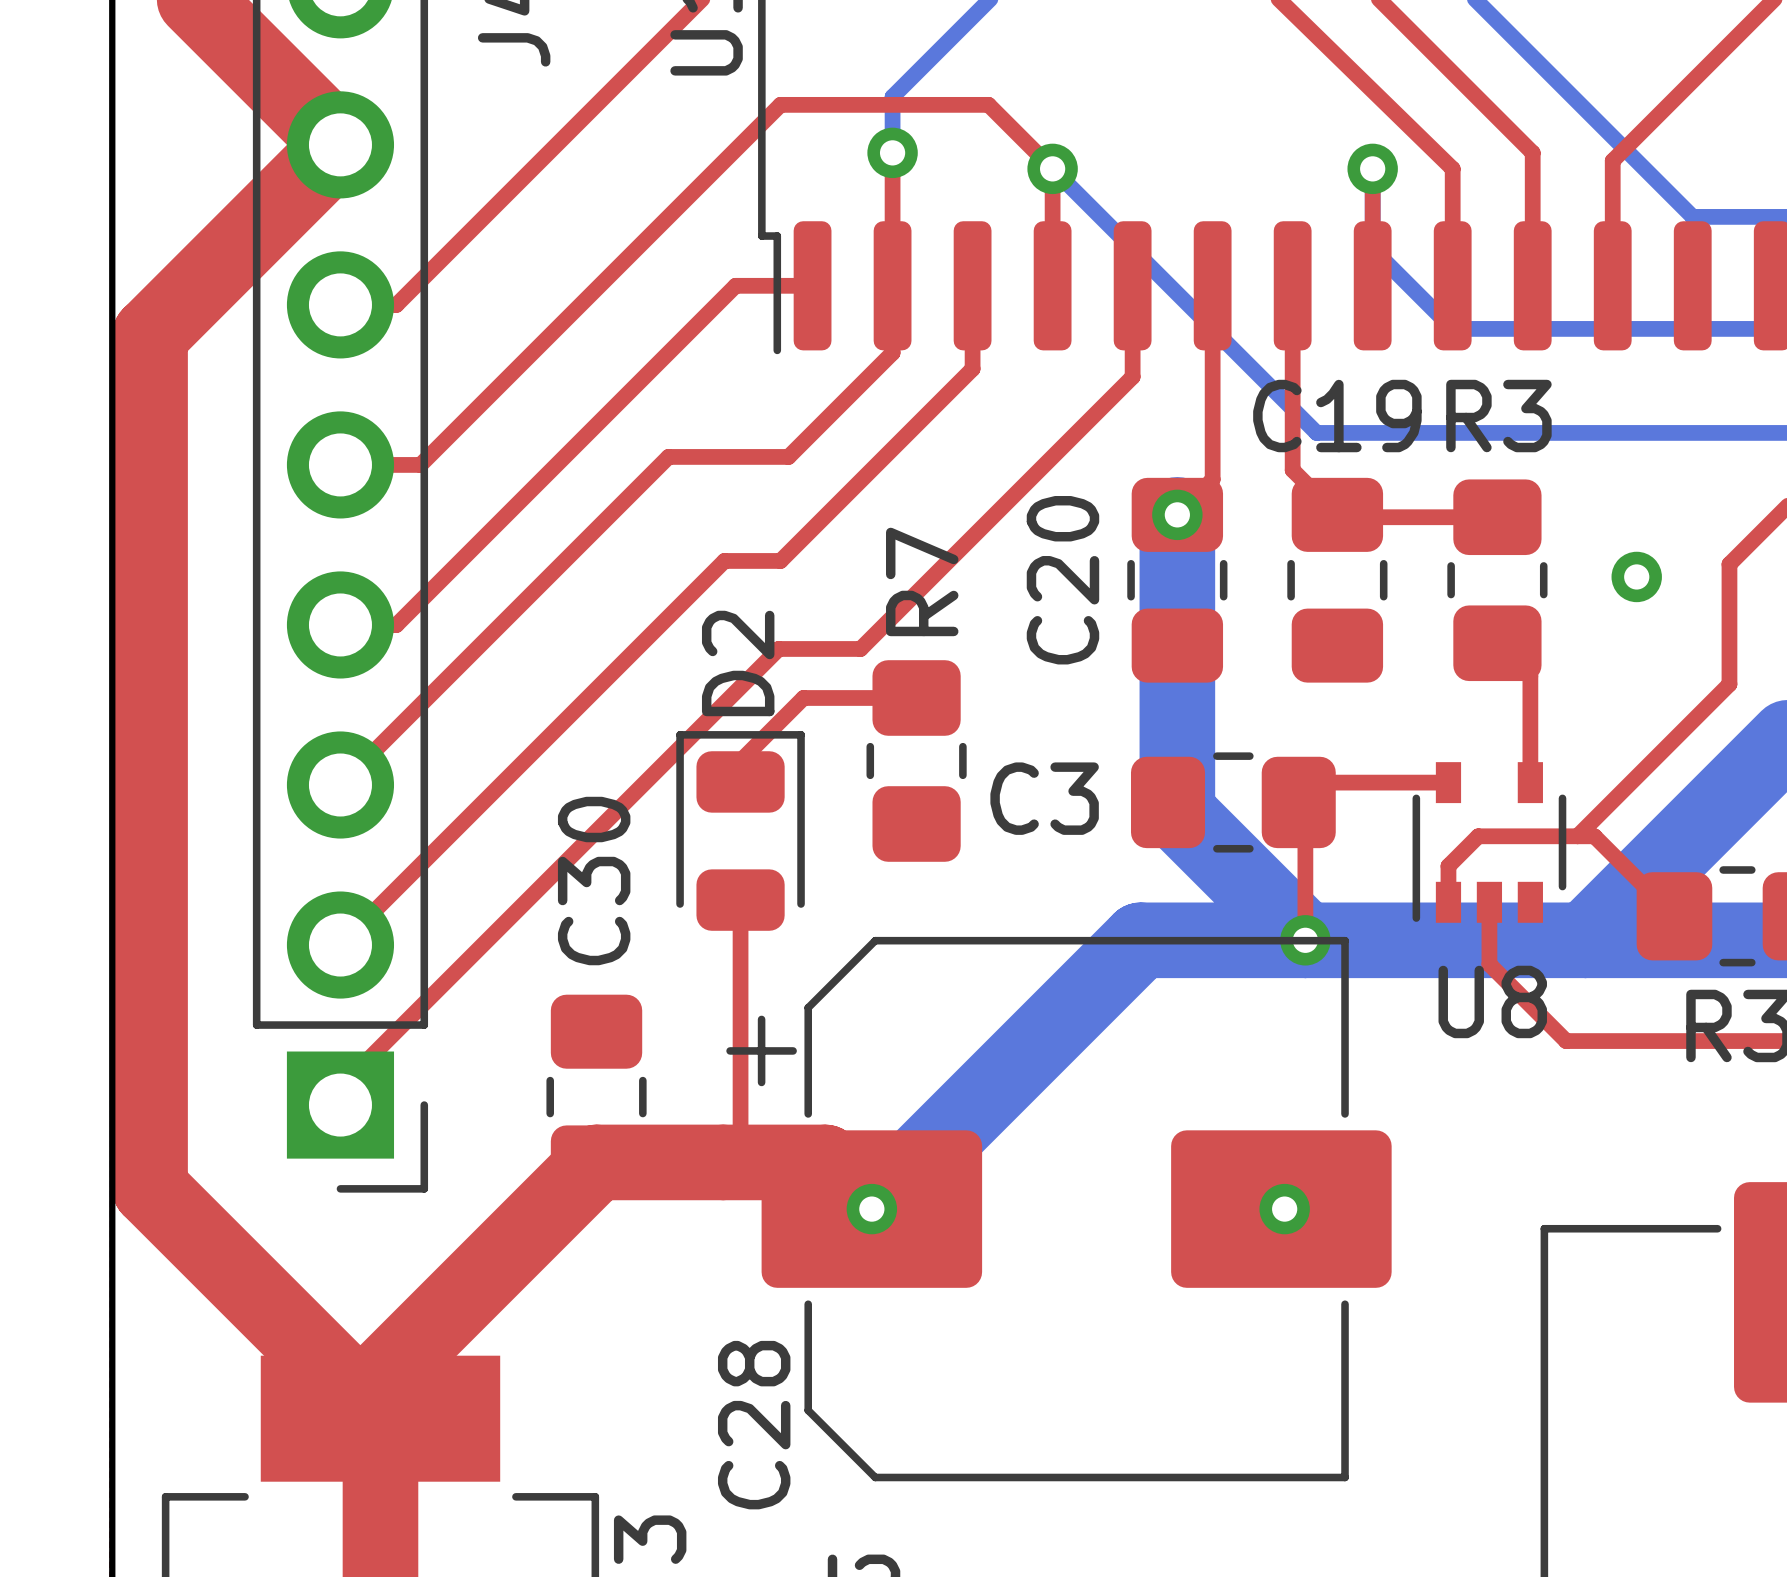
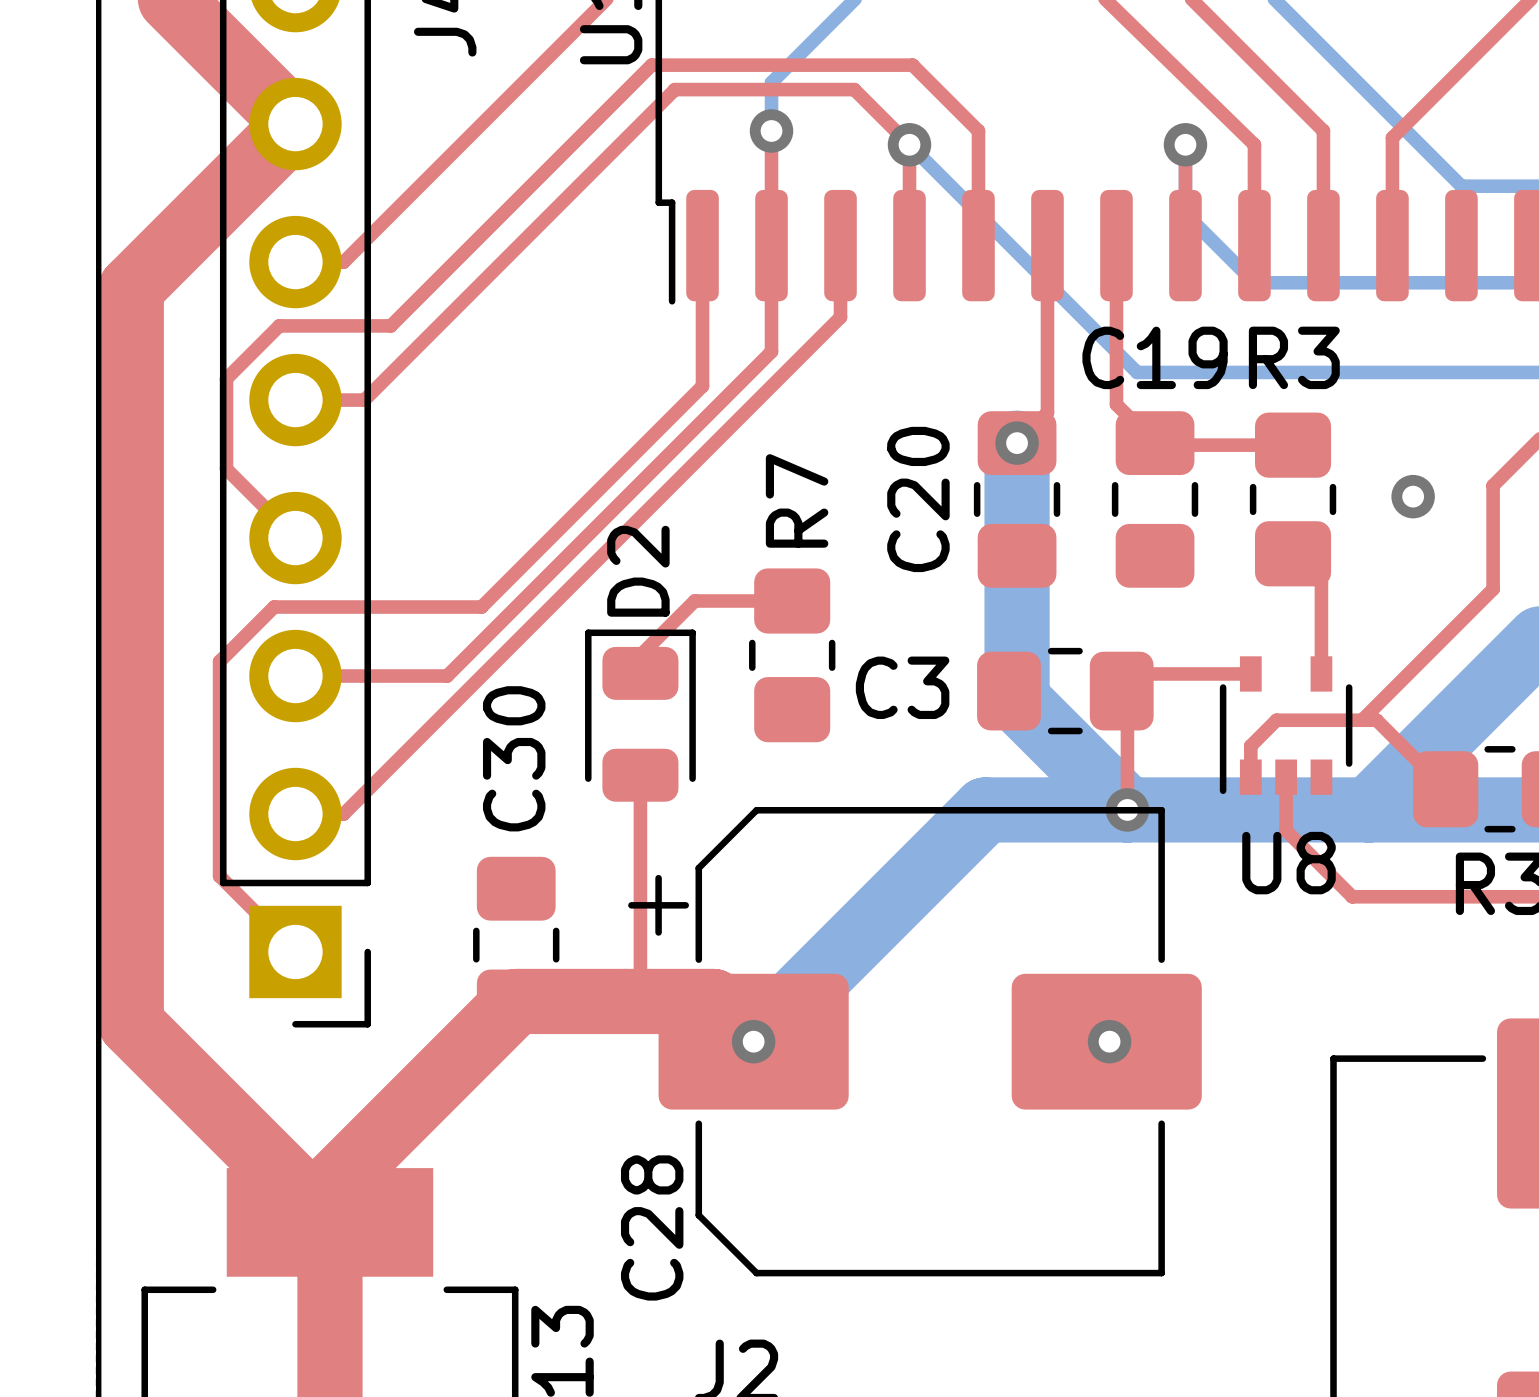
top track: (812, 285) (735, 285) (396, 624) (340, 624) -> (978, 245) (978, 130) (912, 65) (651, 65) (390, 325) (279, 325) (226, 378) (226, 469) (295, 538)
top track: (1132, 285) (1132, 376) (860, 648) (778, 648) (340, 1087) (340, 1105) -> (702, 245) (702, 386) (481, 607) (274, 607) (219, 661) (219, 876) (295, 951)
top track: (892, 352) (788, 456) (668, 456) (340, 785) -> (771, 303) (771, 351) (447, 676) (295, 676)
top track: (780, 560) (724, 560) (340, 945) -> (674, 482) (343, 814) (295, 814)

